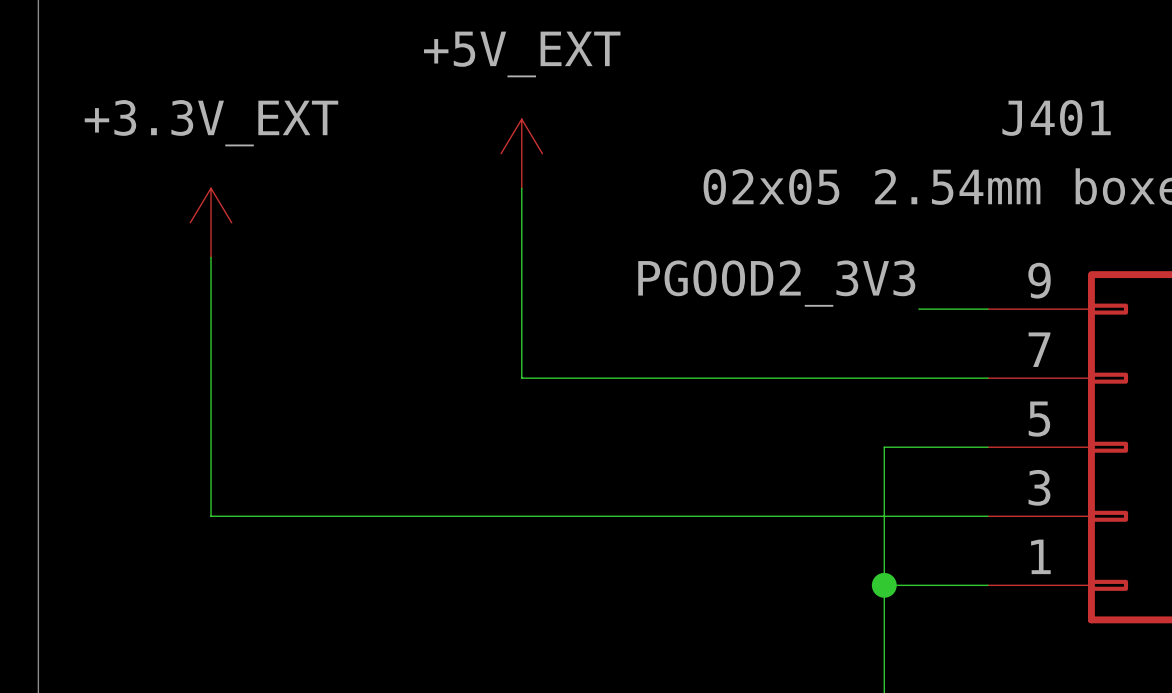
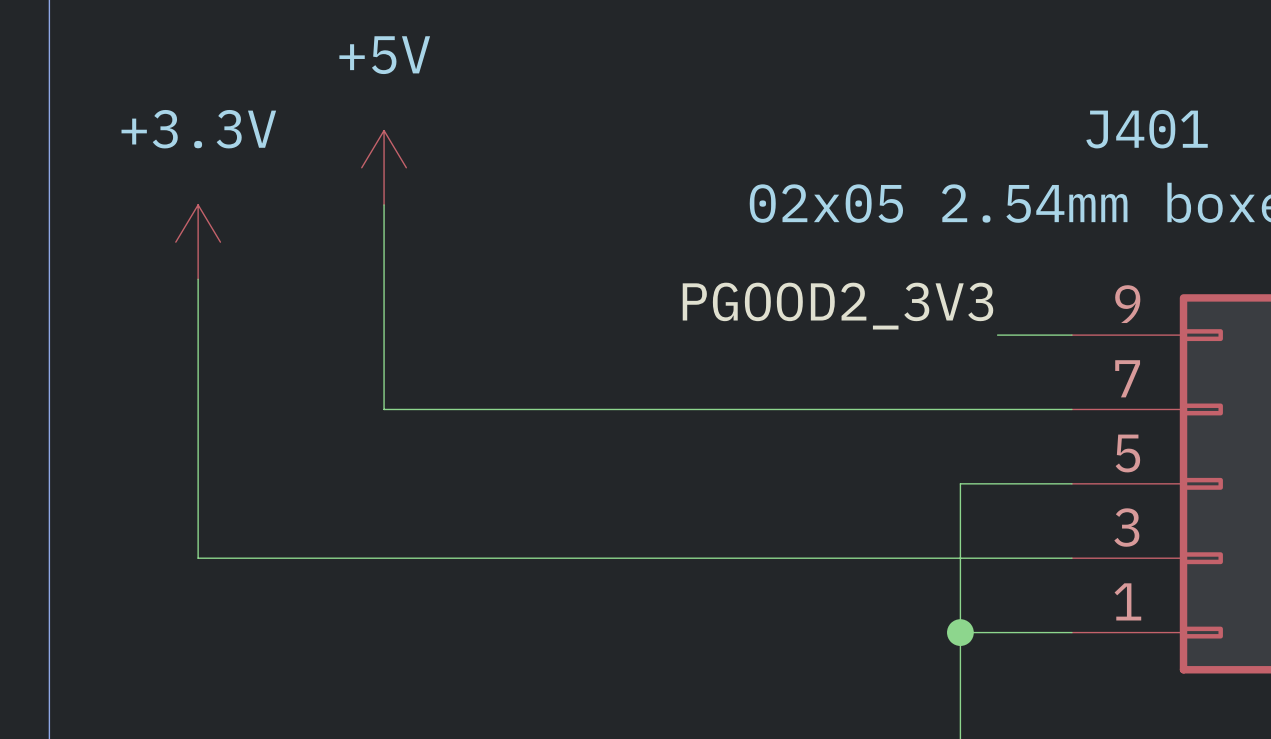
power symbol: none -> +5V (384, 167)
power symbol: +5V_EXT (521, 153) -> none
wire: (521, 188) (521, 378) -> (384, 204) (384, 409) (569, 409)
power symbol: none -> +3.3V (198, 242)
power symbol: +3.3V_EXT (211, 222) -> none
wire: (211, 257) (211, 516) -> (198, 279) (198, 558) (235, 558)

